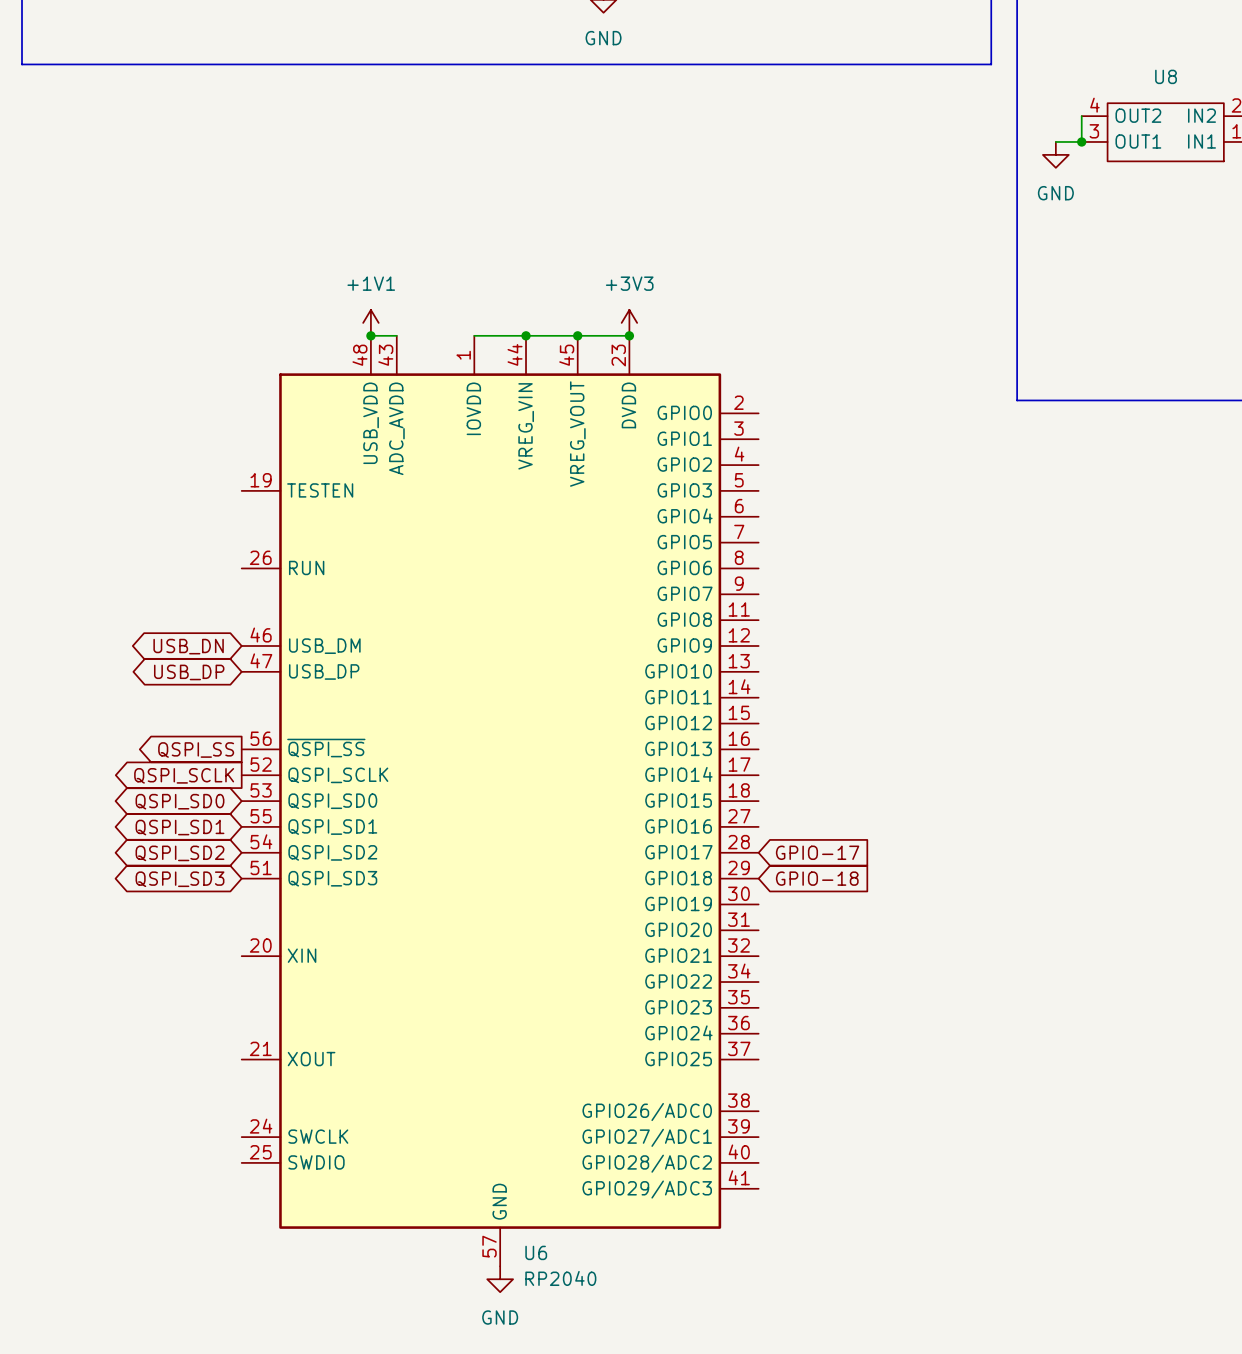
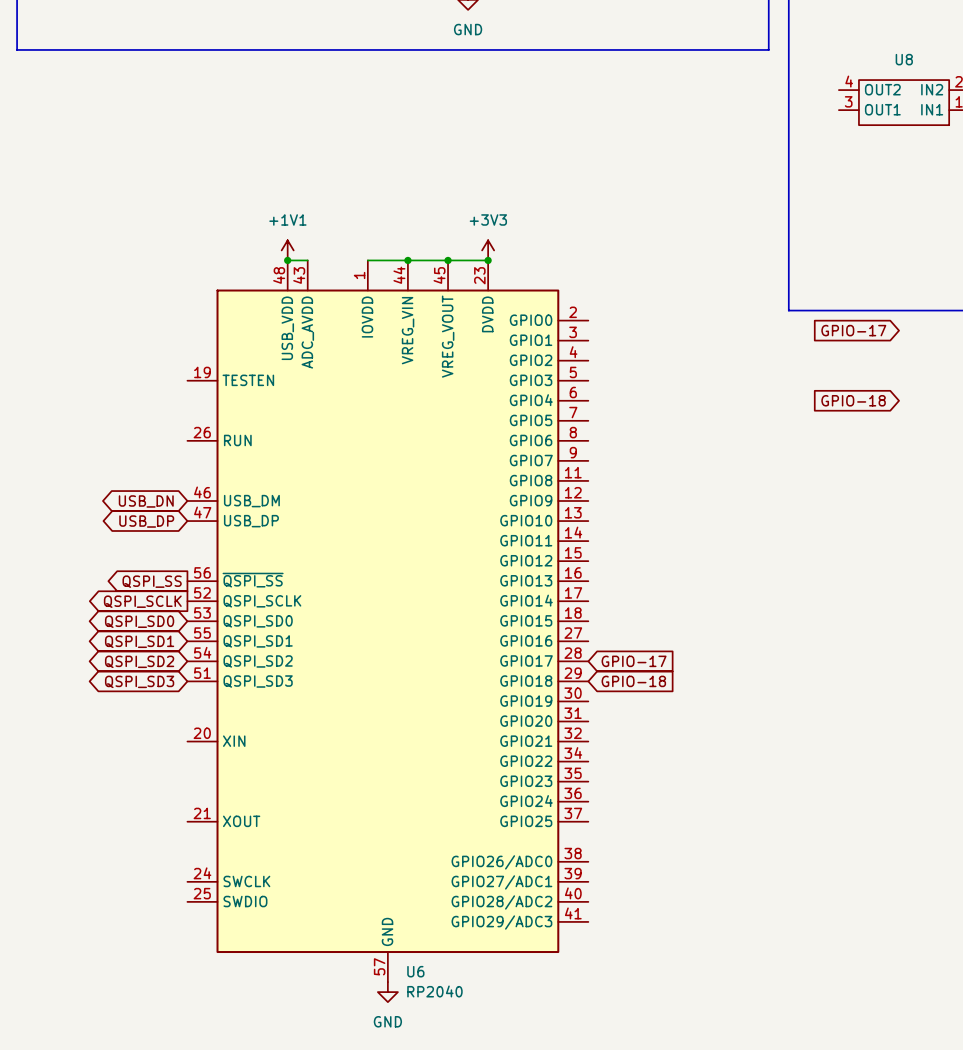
wire: (1081, 116) (1081, 141) (1055, 141) -> none
junction: (1081, 141) -> none
power symbol: GND (1055, 154) -> none
global label: none -> GPIO-17 (853, 330)
global label: none -> GPIO-18 (853, 400)

